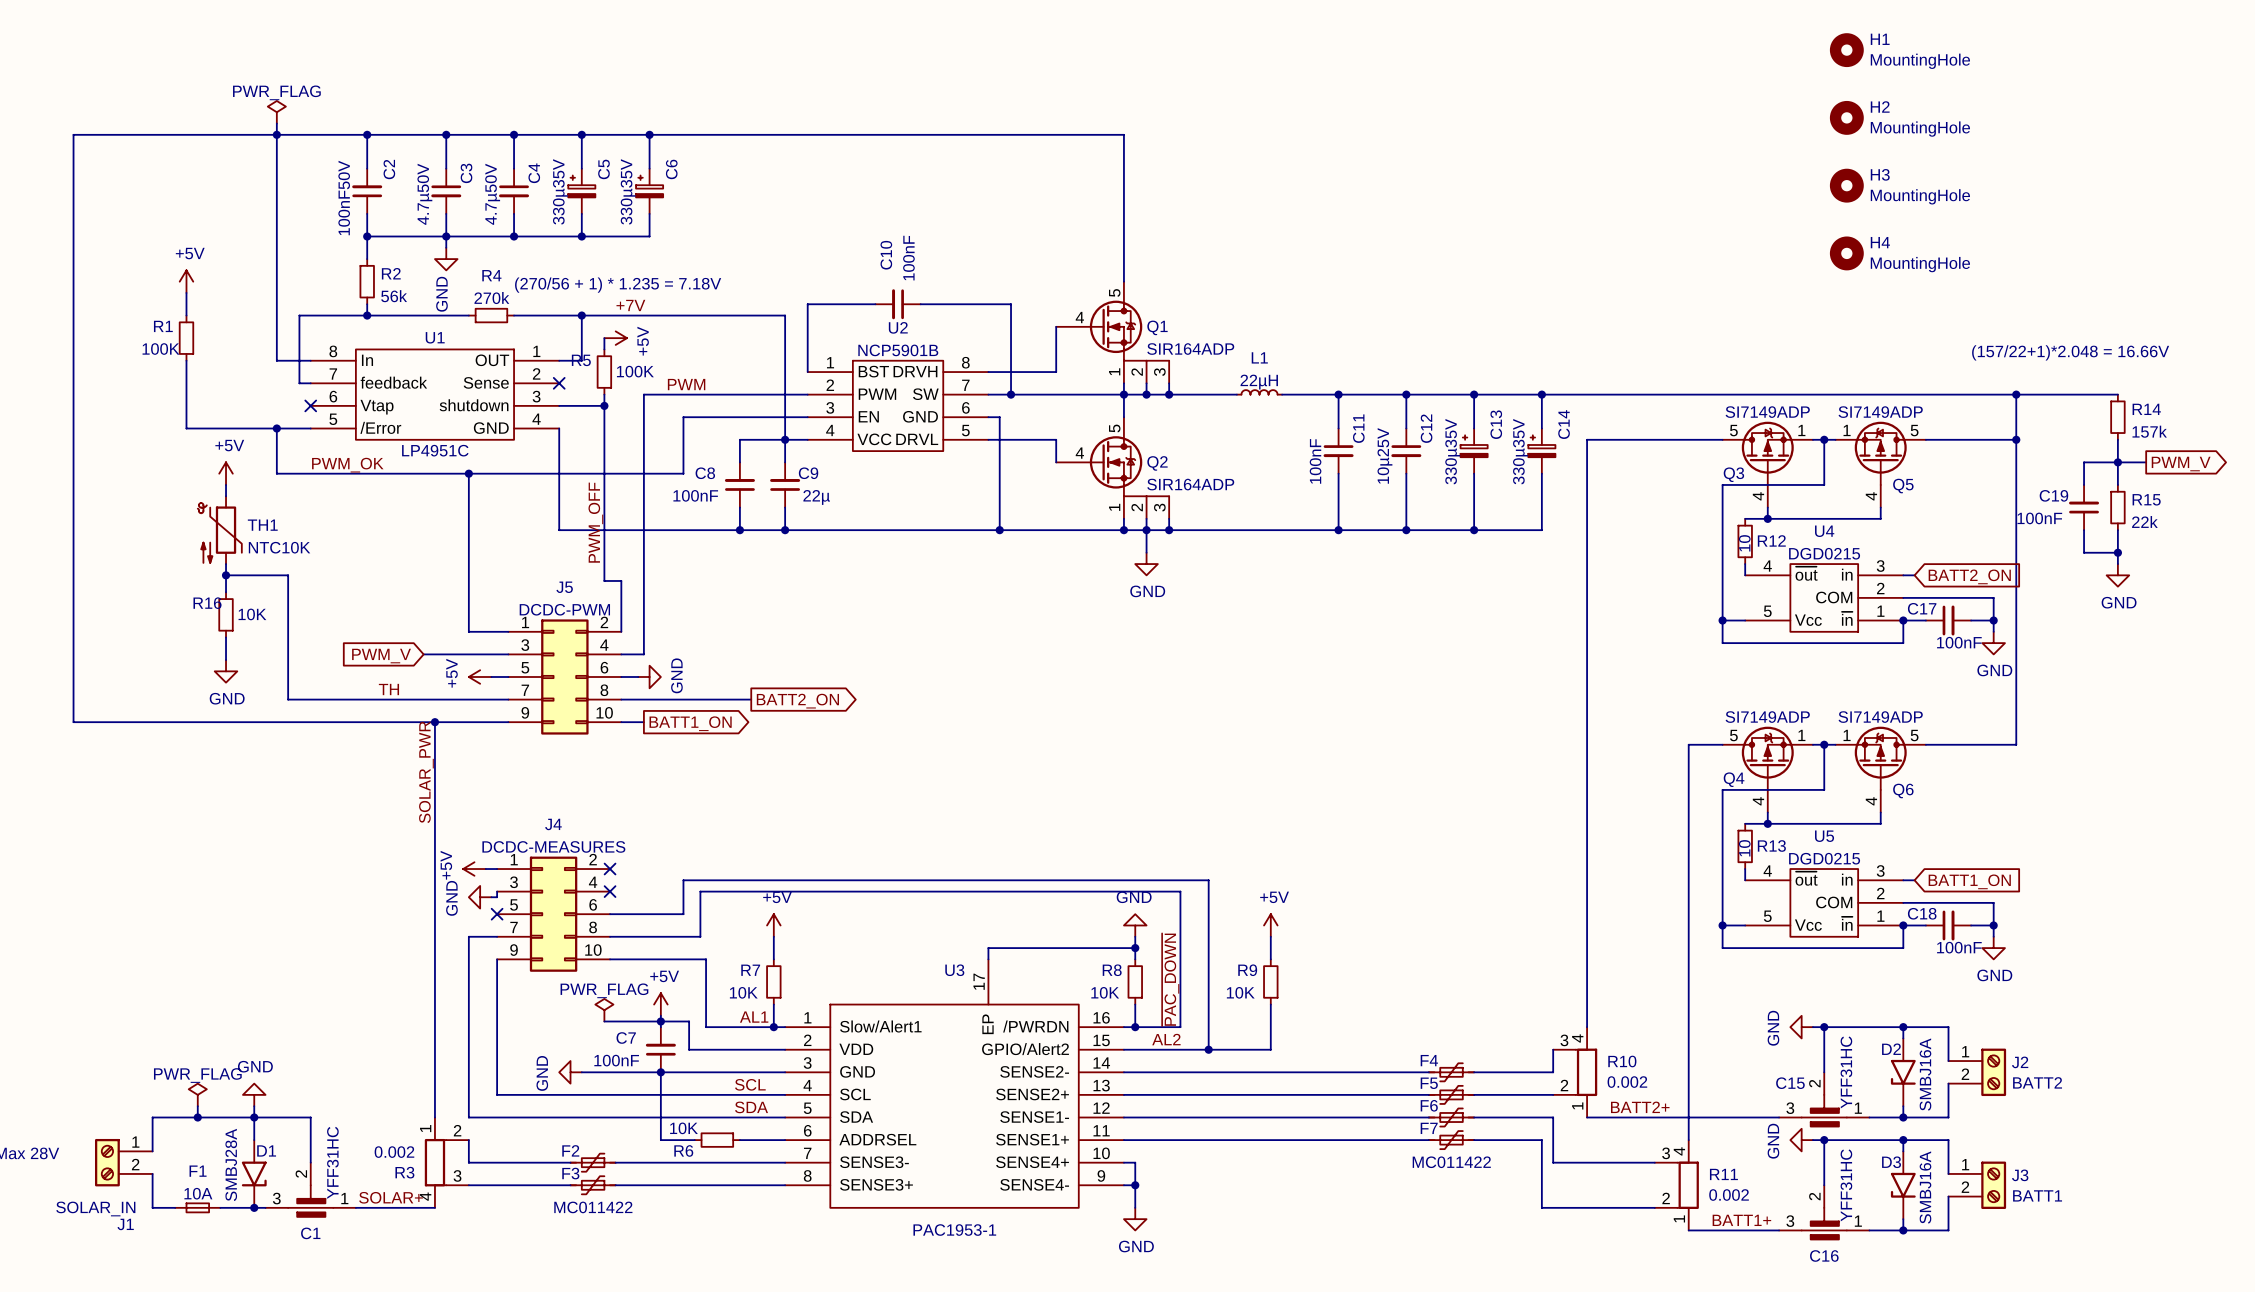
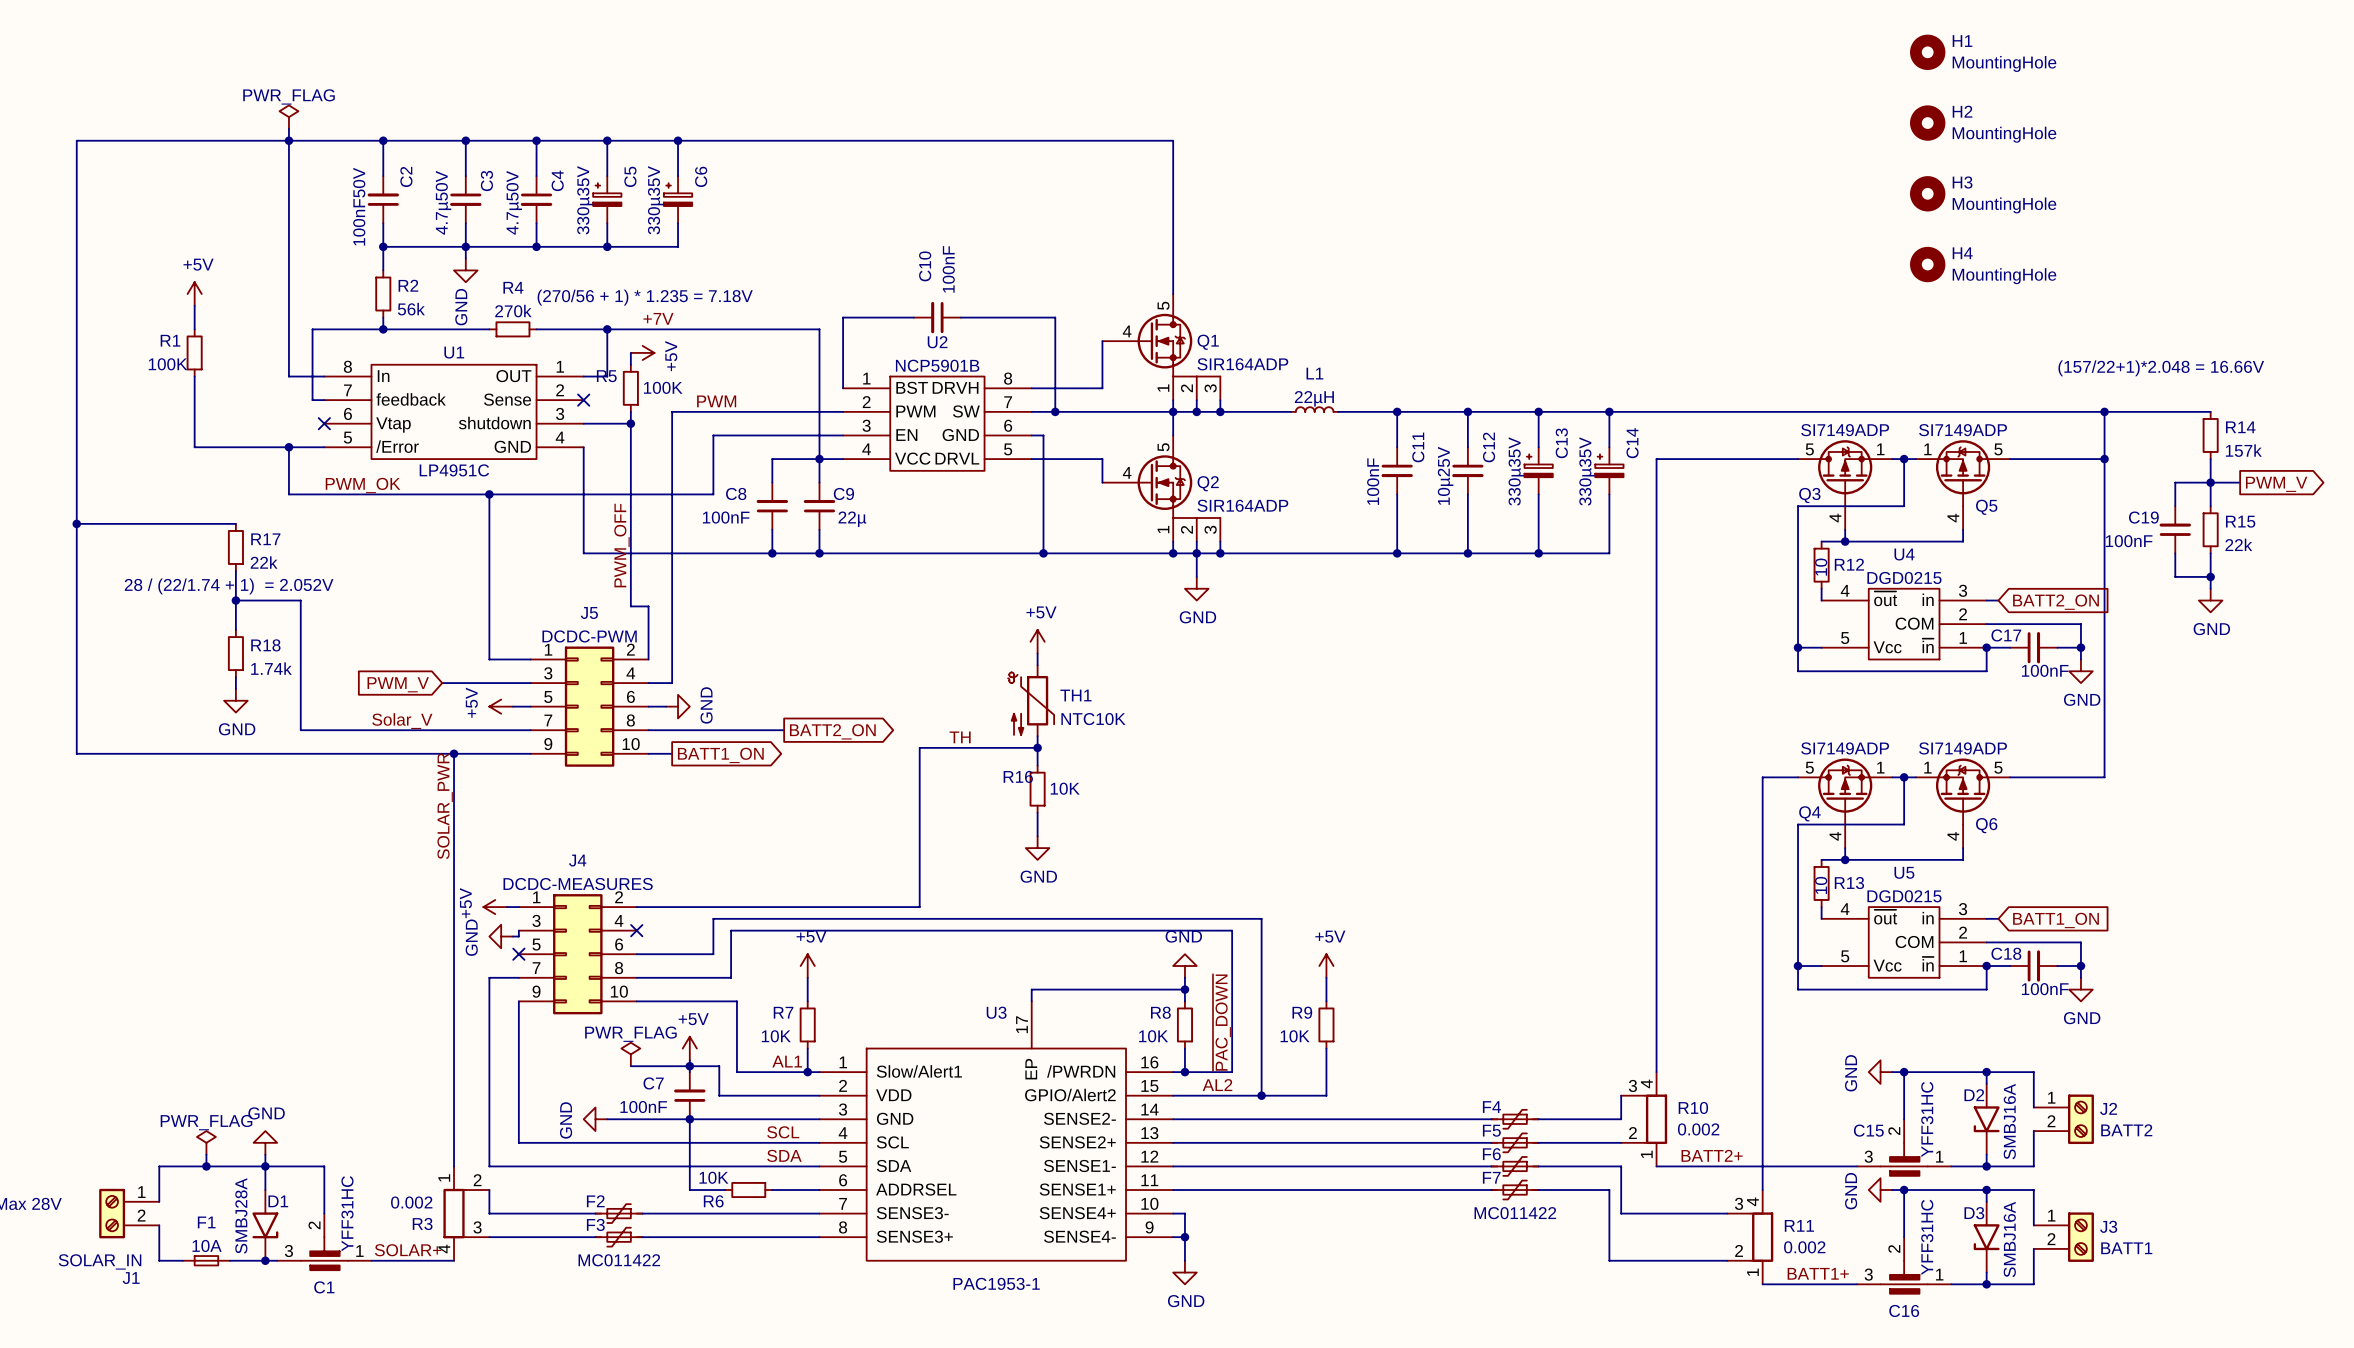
power symbol: +5V (226, 473) -> none
wire: (226, 484) (226, 496) -> none
wire: none -> (76, 523) (235, 523)
junction: none -> (76, 523)
R17: none -> 22k (235, 547)
TH1 position: (219, 530) -> (1031, 700)
text: none -> 28 / (22/1.74 + 1) = 2.052V (229, 586)
R16 position: (226, 614) -> (1037, 789)
power symbol: none -> +5V (1037, 641)
R18: none -> 1.74k (235, 653)
wire: none -> (1037, 653) (1037, 665)
label: TH (388, 689) -> none
label: none -> Solar_V (402, 721)
wire: none -> (1037, 736) (1037, 765)
label: none -> TH (960, 737)
wire: none -> (1037, 747) (919, 747) (919, 907) (636, 907)
junction: none -> (1037, 747)
wire: none -> (1037, 812) (1037, 836)
power symbol: none -> GND (1037, 848)
no-connect mark: (610, 869) -> none

